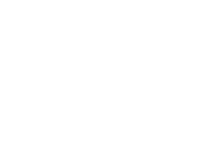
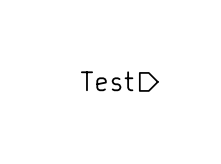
hierarchical label: none -> Test (107, 81)

